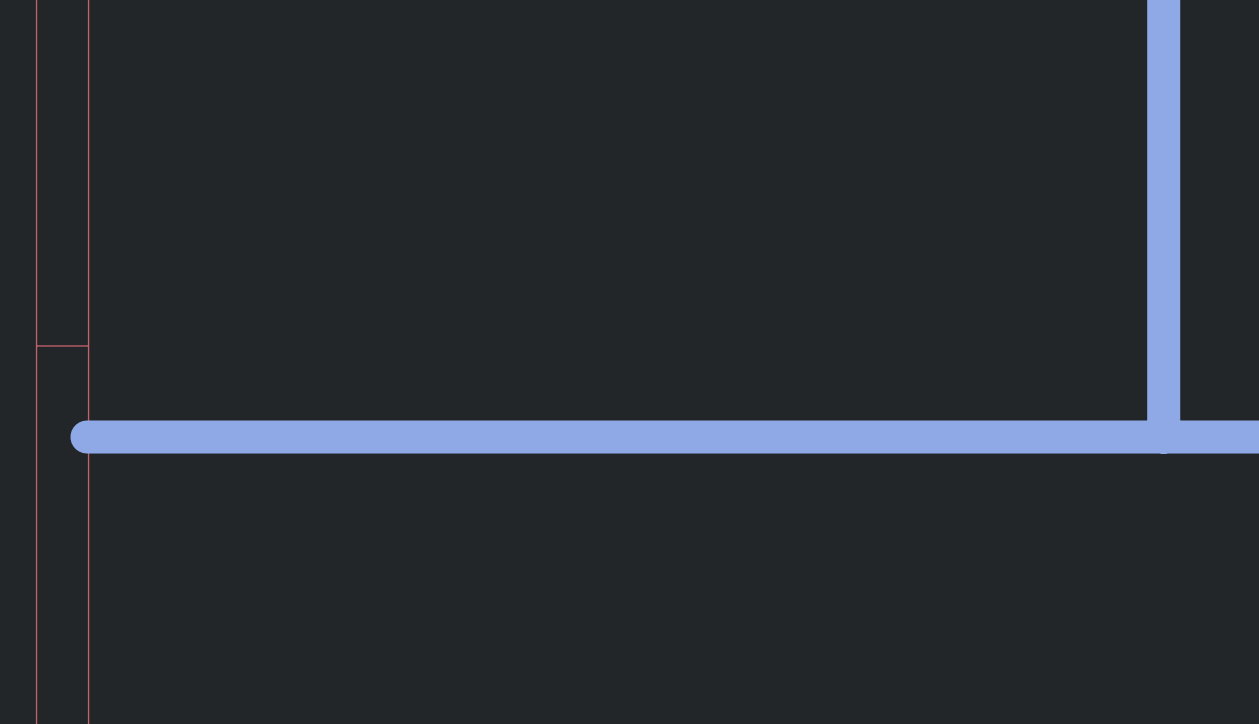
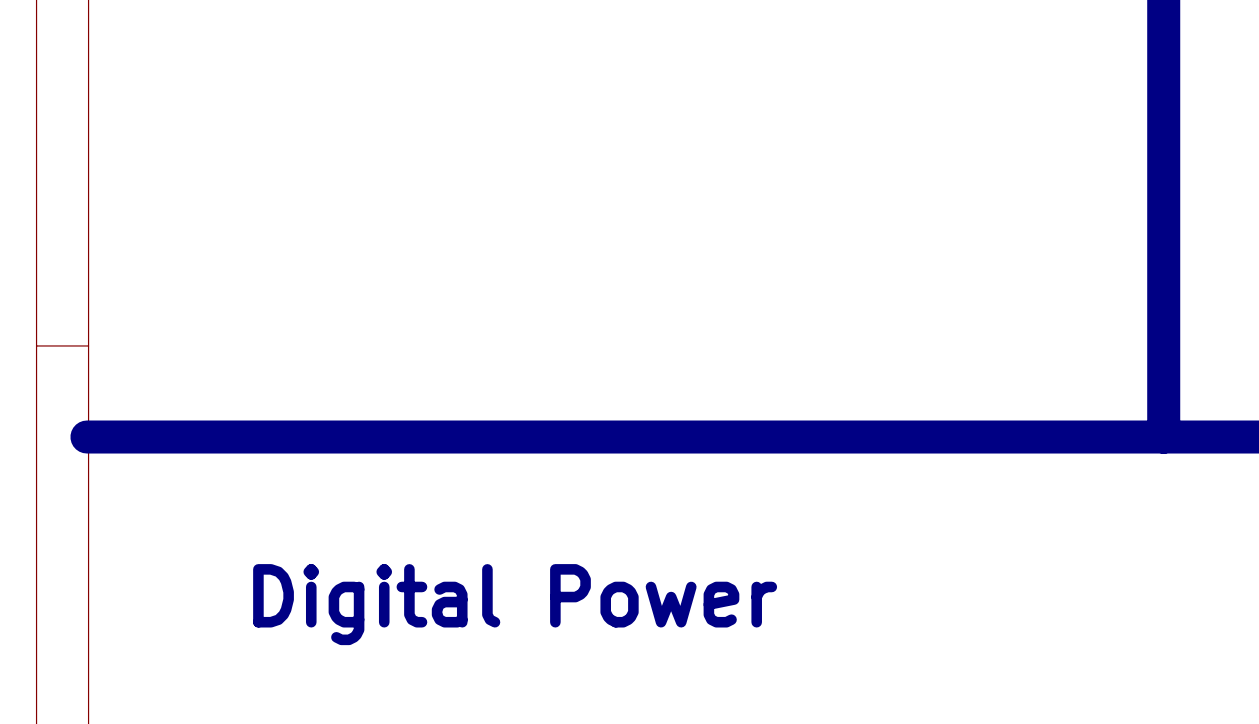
text: none -> Digital Power (515, 604)

